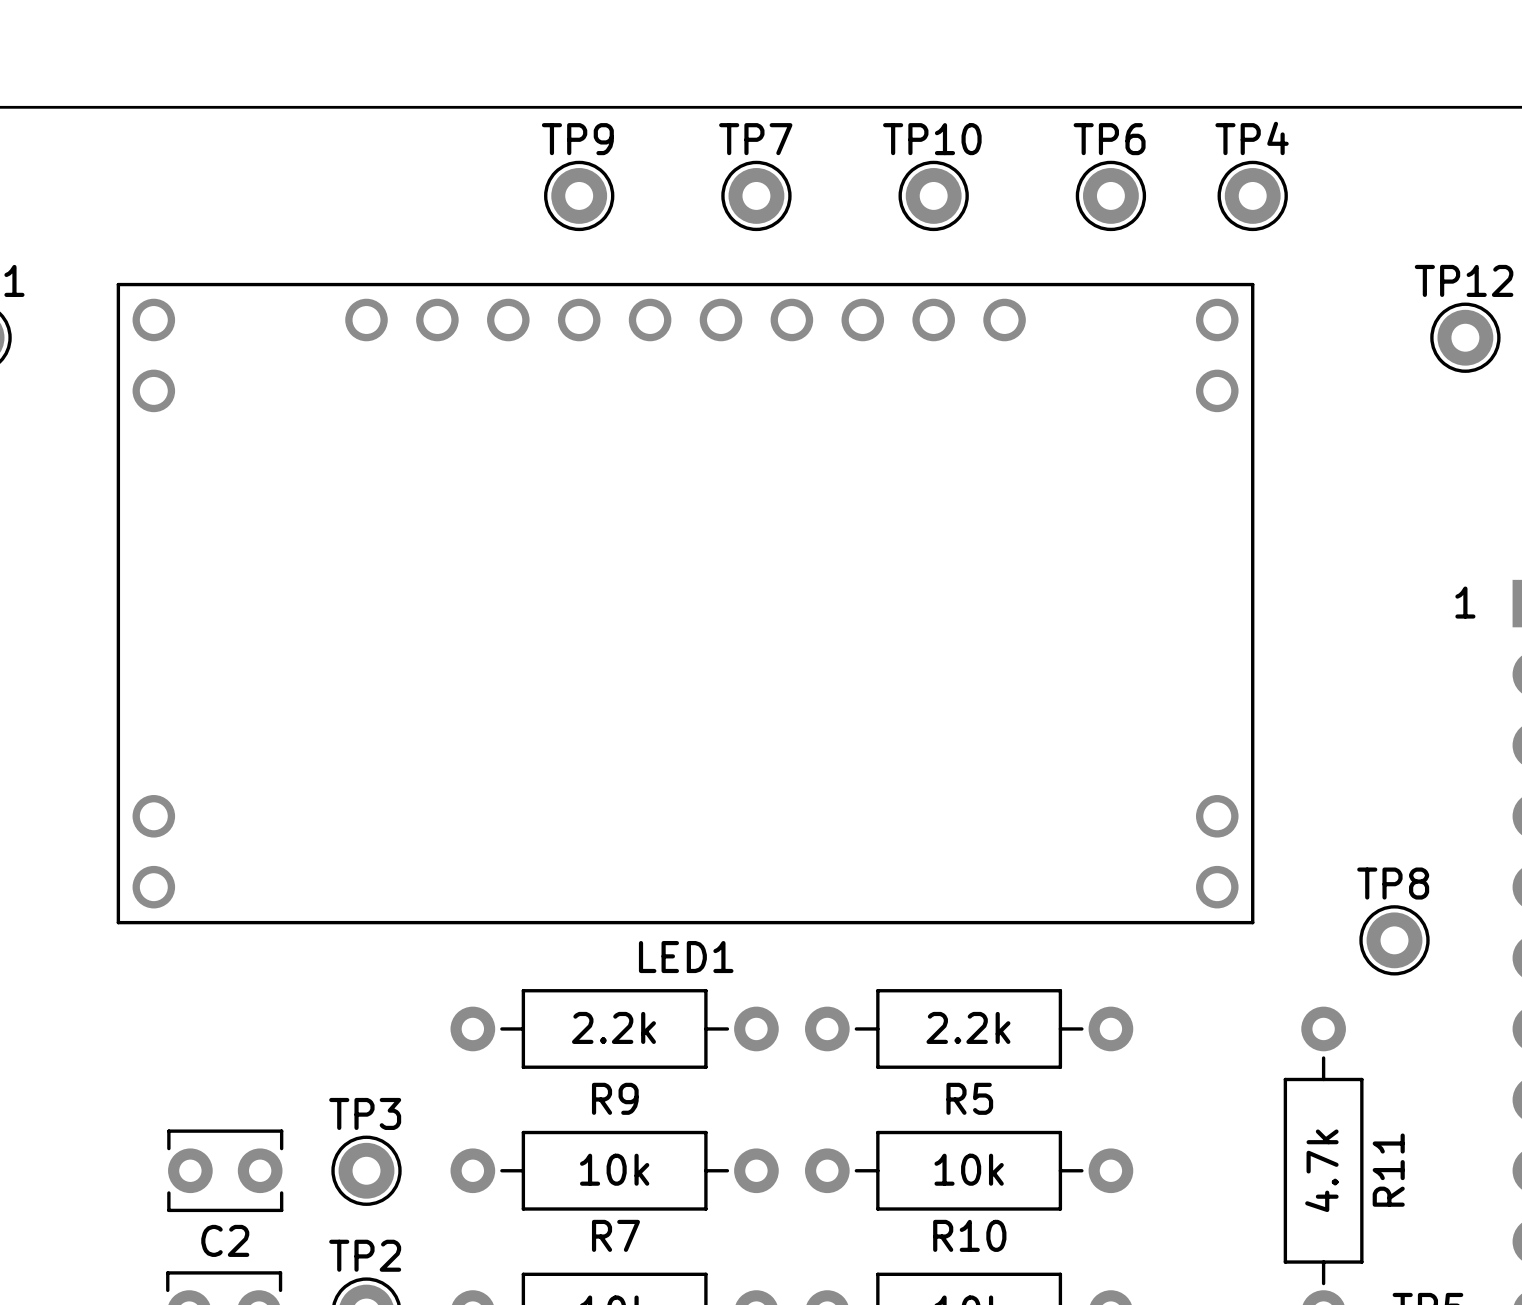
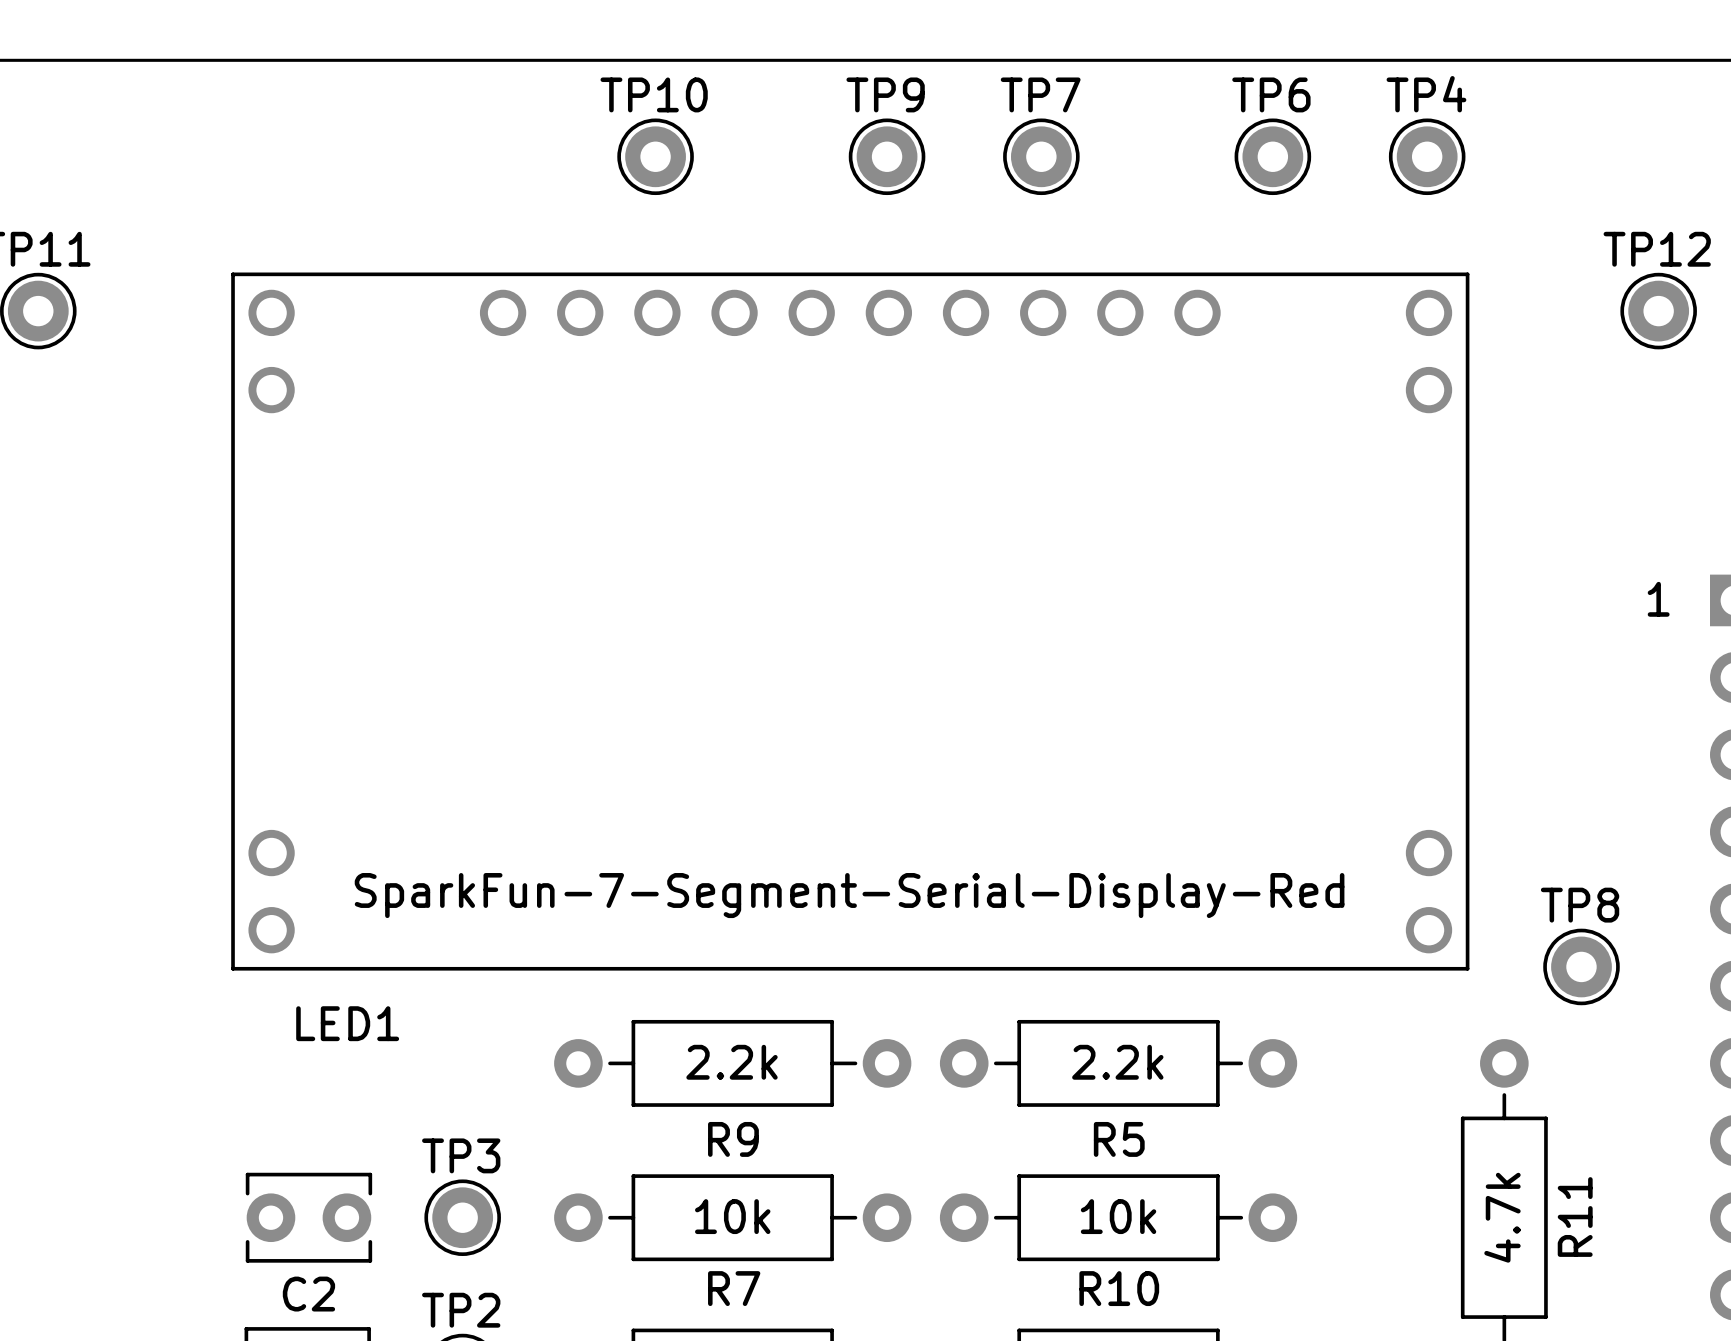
TP7 name: TP7 (755, 139) -> TP9 (885, 94)
TP9: (579, 195) -> none
TP7: none -> (1041, 156)
TP10 position: (933, 195) -> (655, 156)
LED1 position: (685, 603) -> (850, 621)
LED1 value: none -> SparkFun-7-Segment-Serial-Display-Red (849, 895)
LED1 name position: LED1 (686, 957) -> LED1 (347, 1023)

